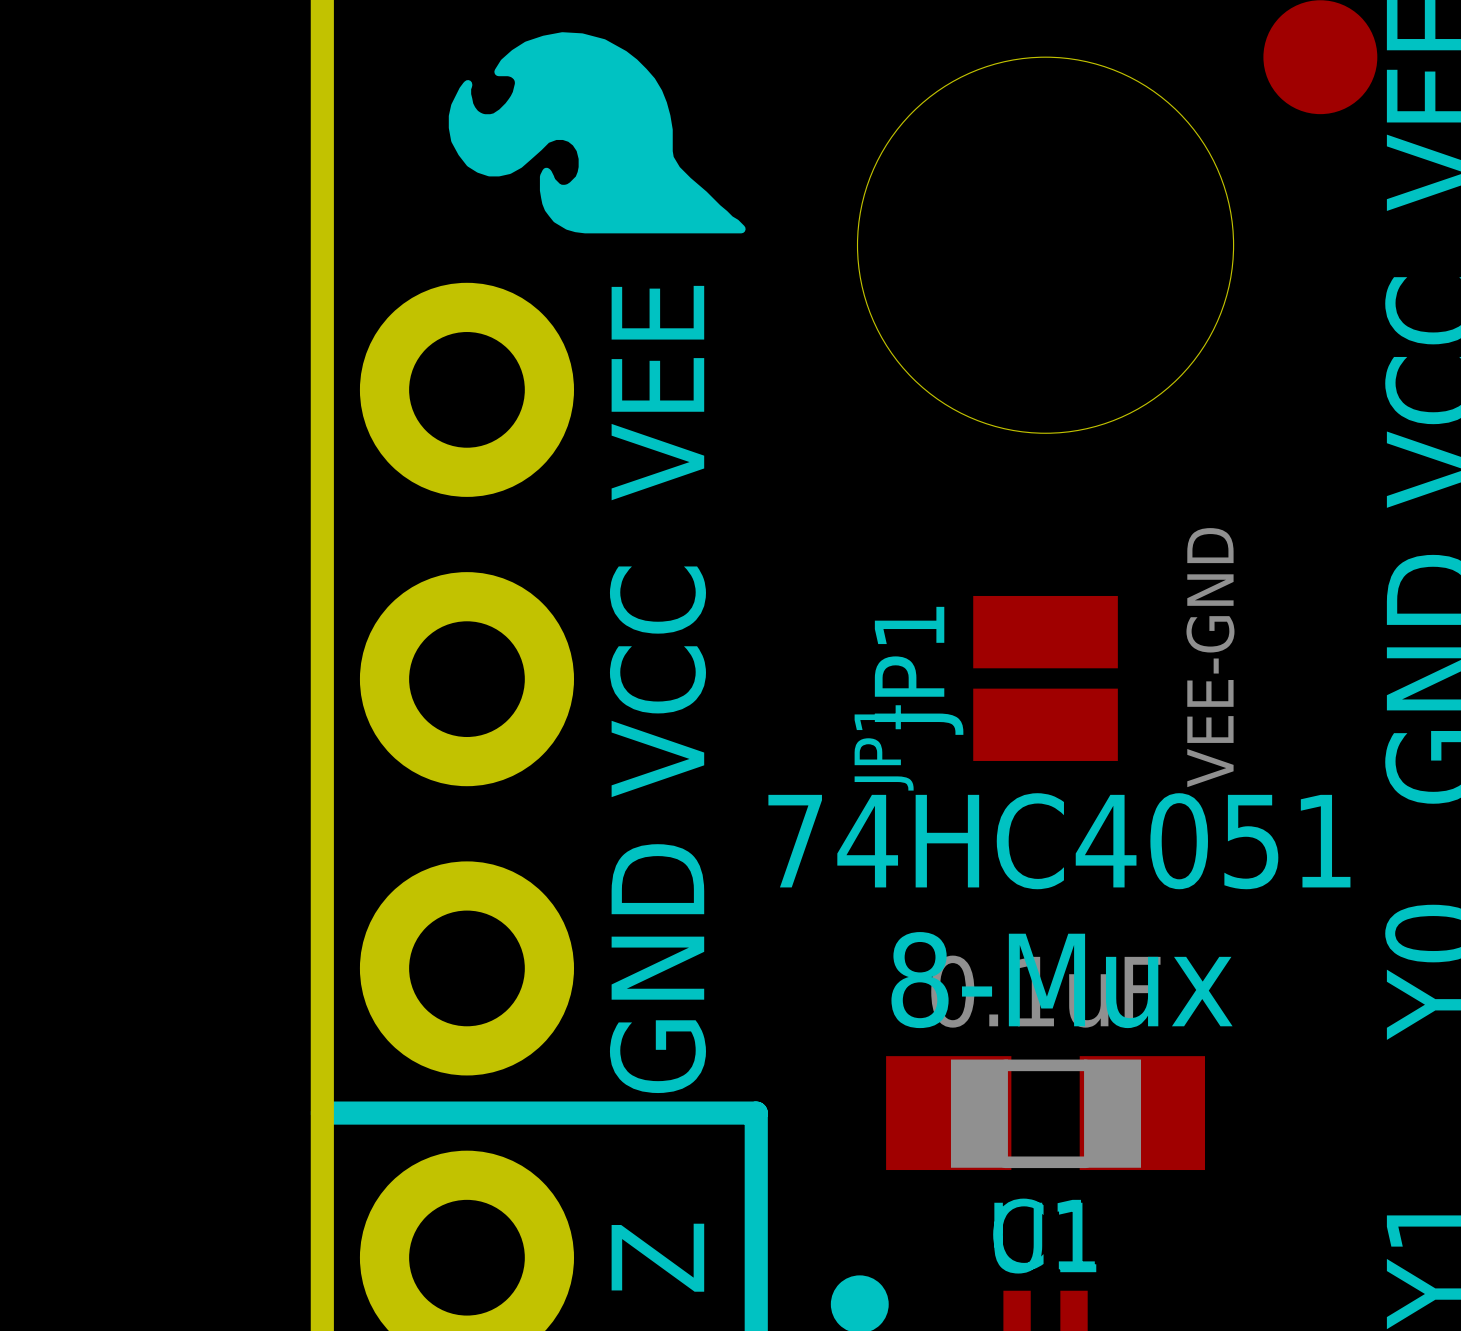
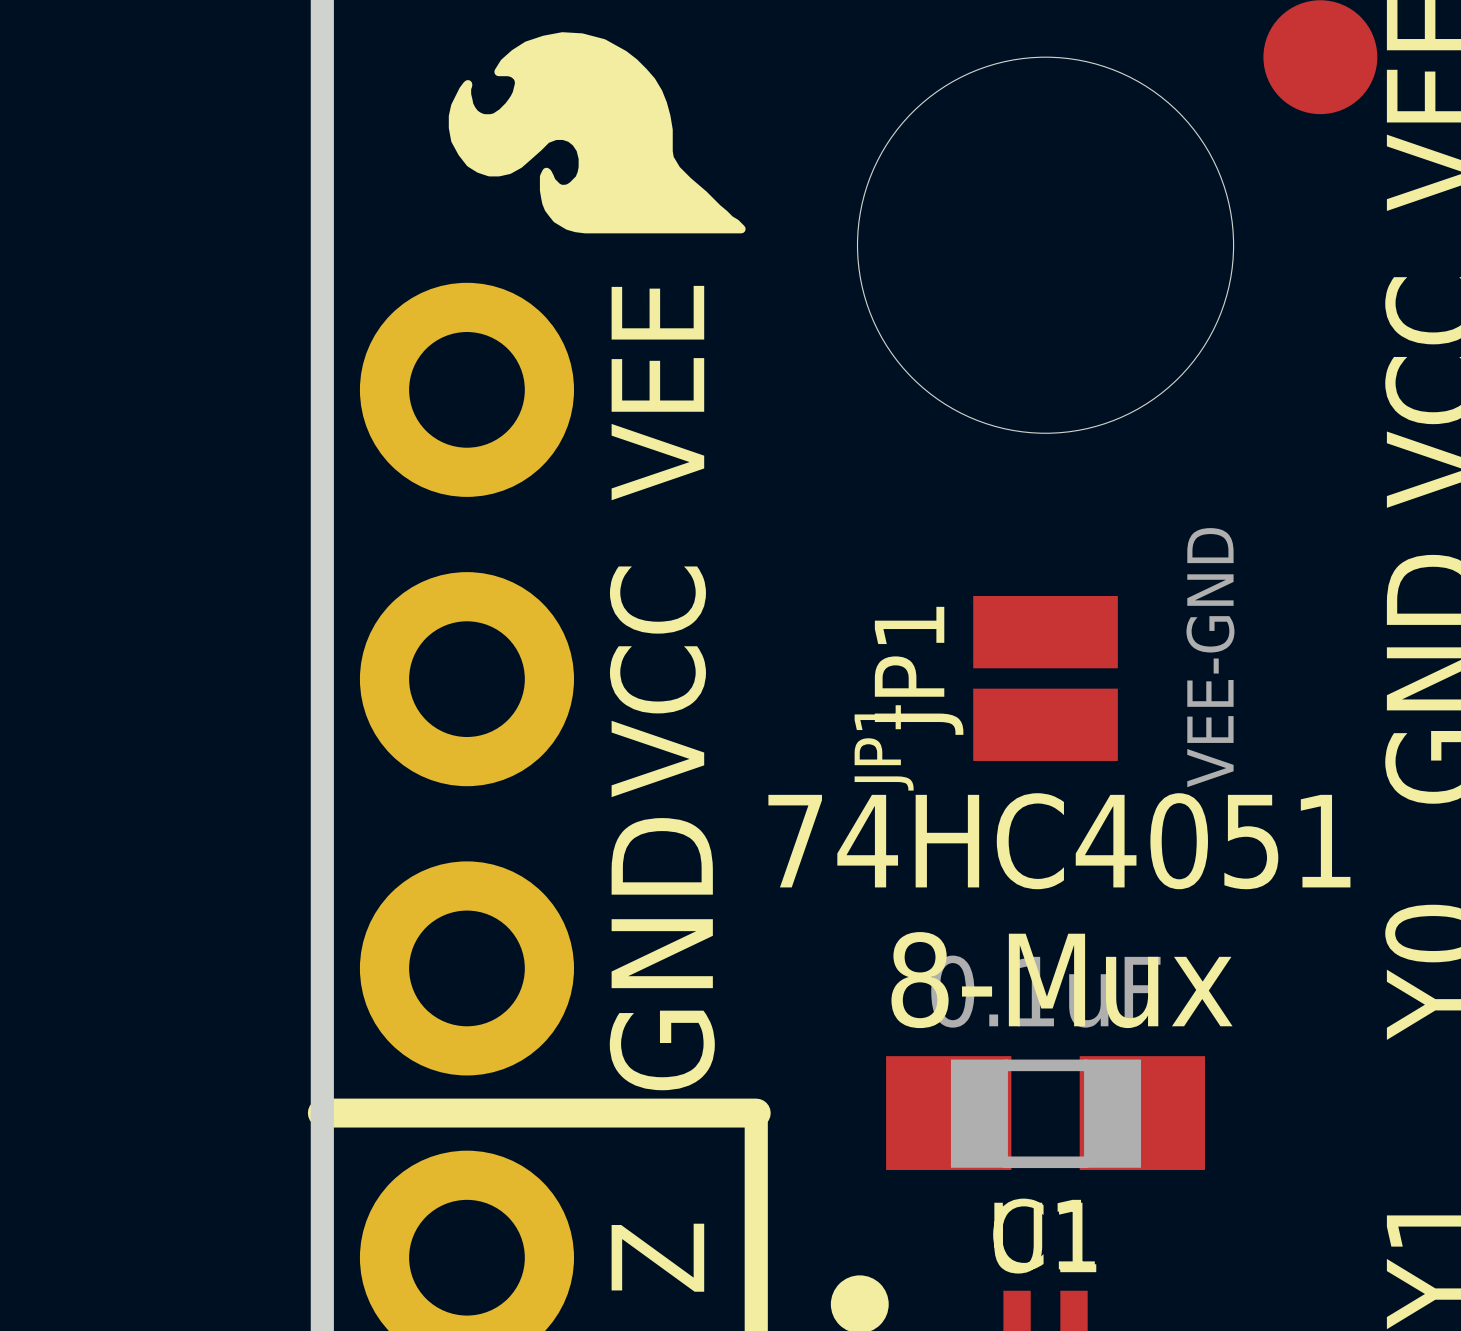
text position: GND (657, 968) -> GND (662, 954)
line width: thin (322, 1113) (756, 1113) -> thick (322, 1113) (756, 1113)

